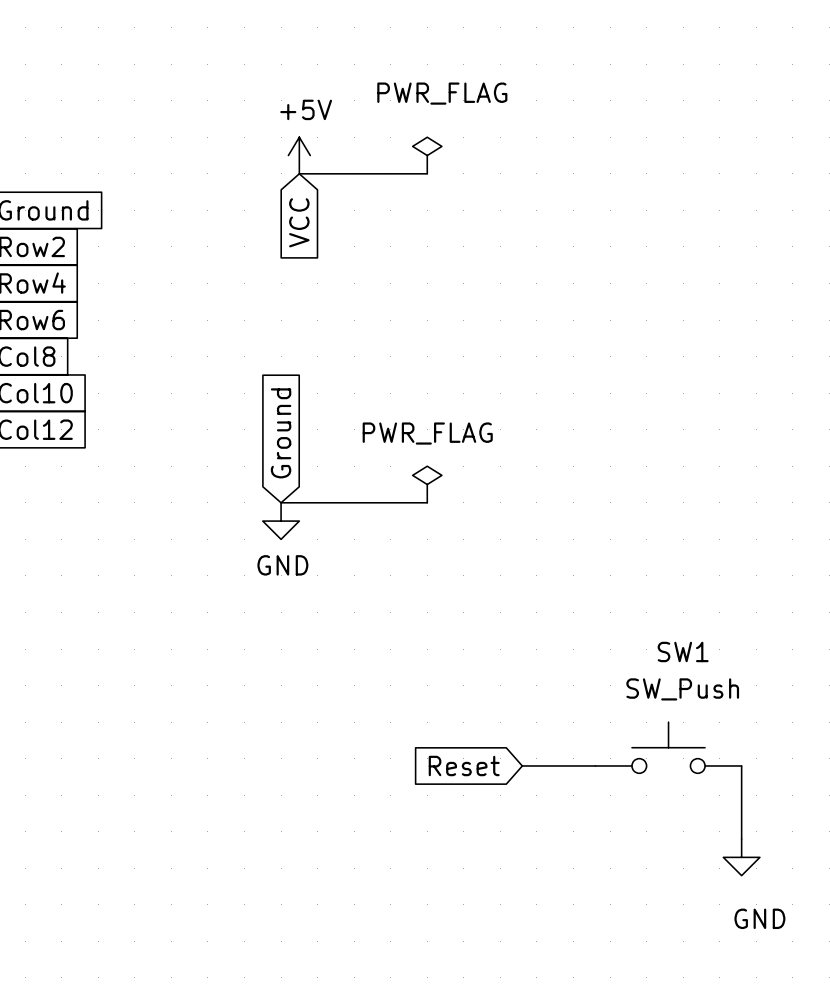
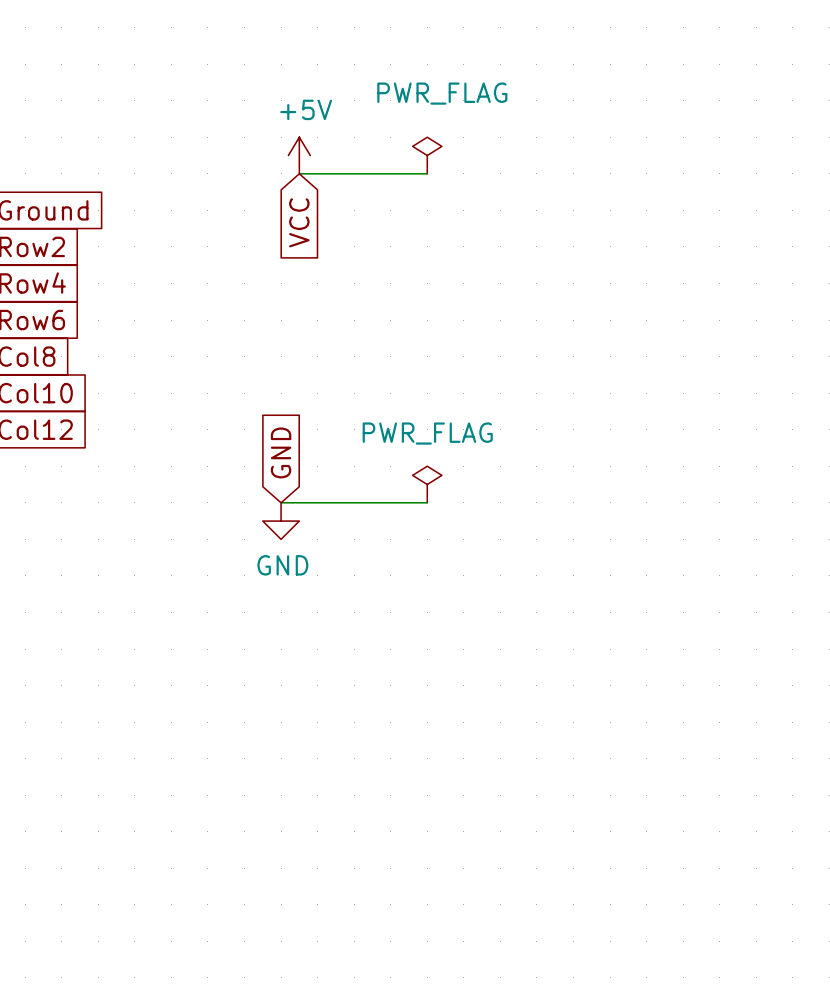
global label: Ground (281, 433) -> GND (281, 452)
SW1: SW_Push (668, 747) -> none
global label: Reset (464, 765) -> none
wire: (522, 765) (595, 765) -> none
wire: (741, 765) (741, 839) -> none
power symbol: GND (741, 857) -> none

